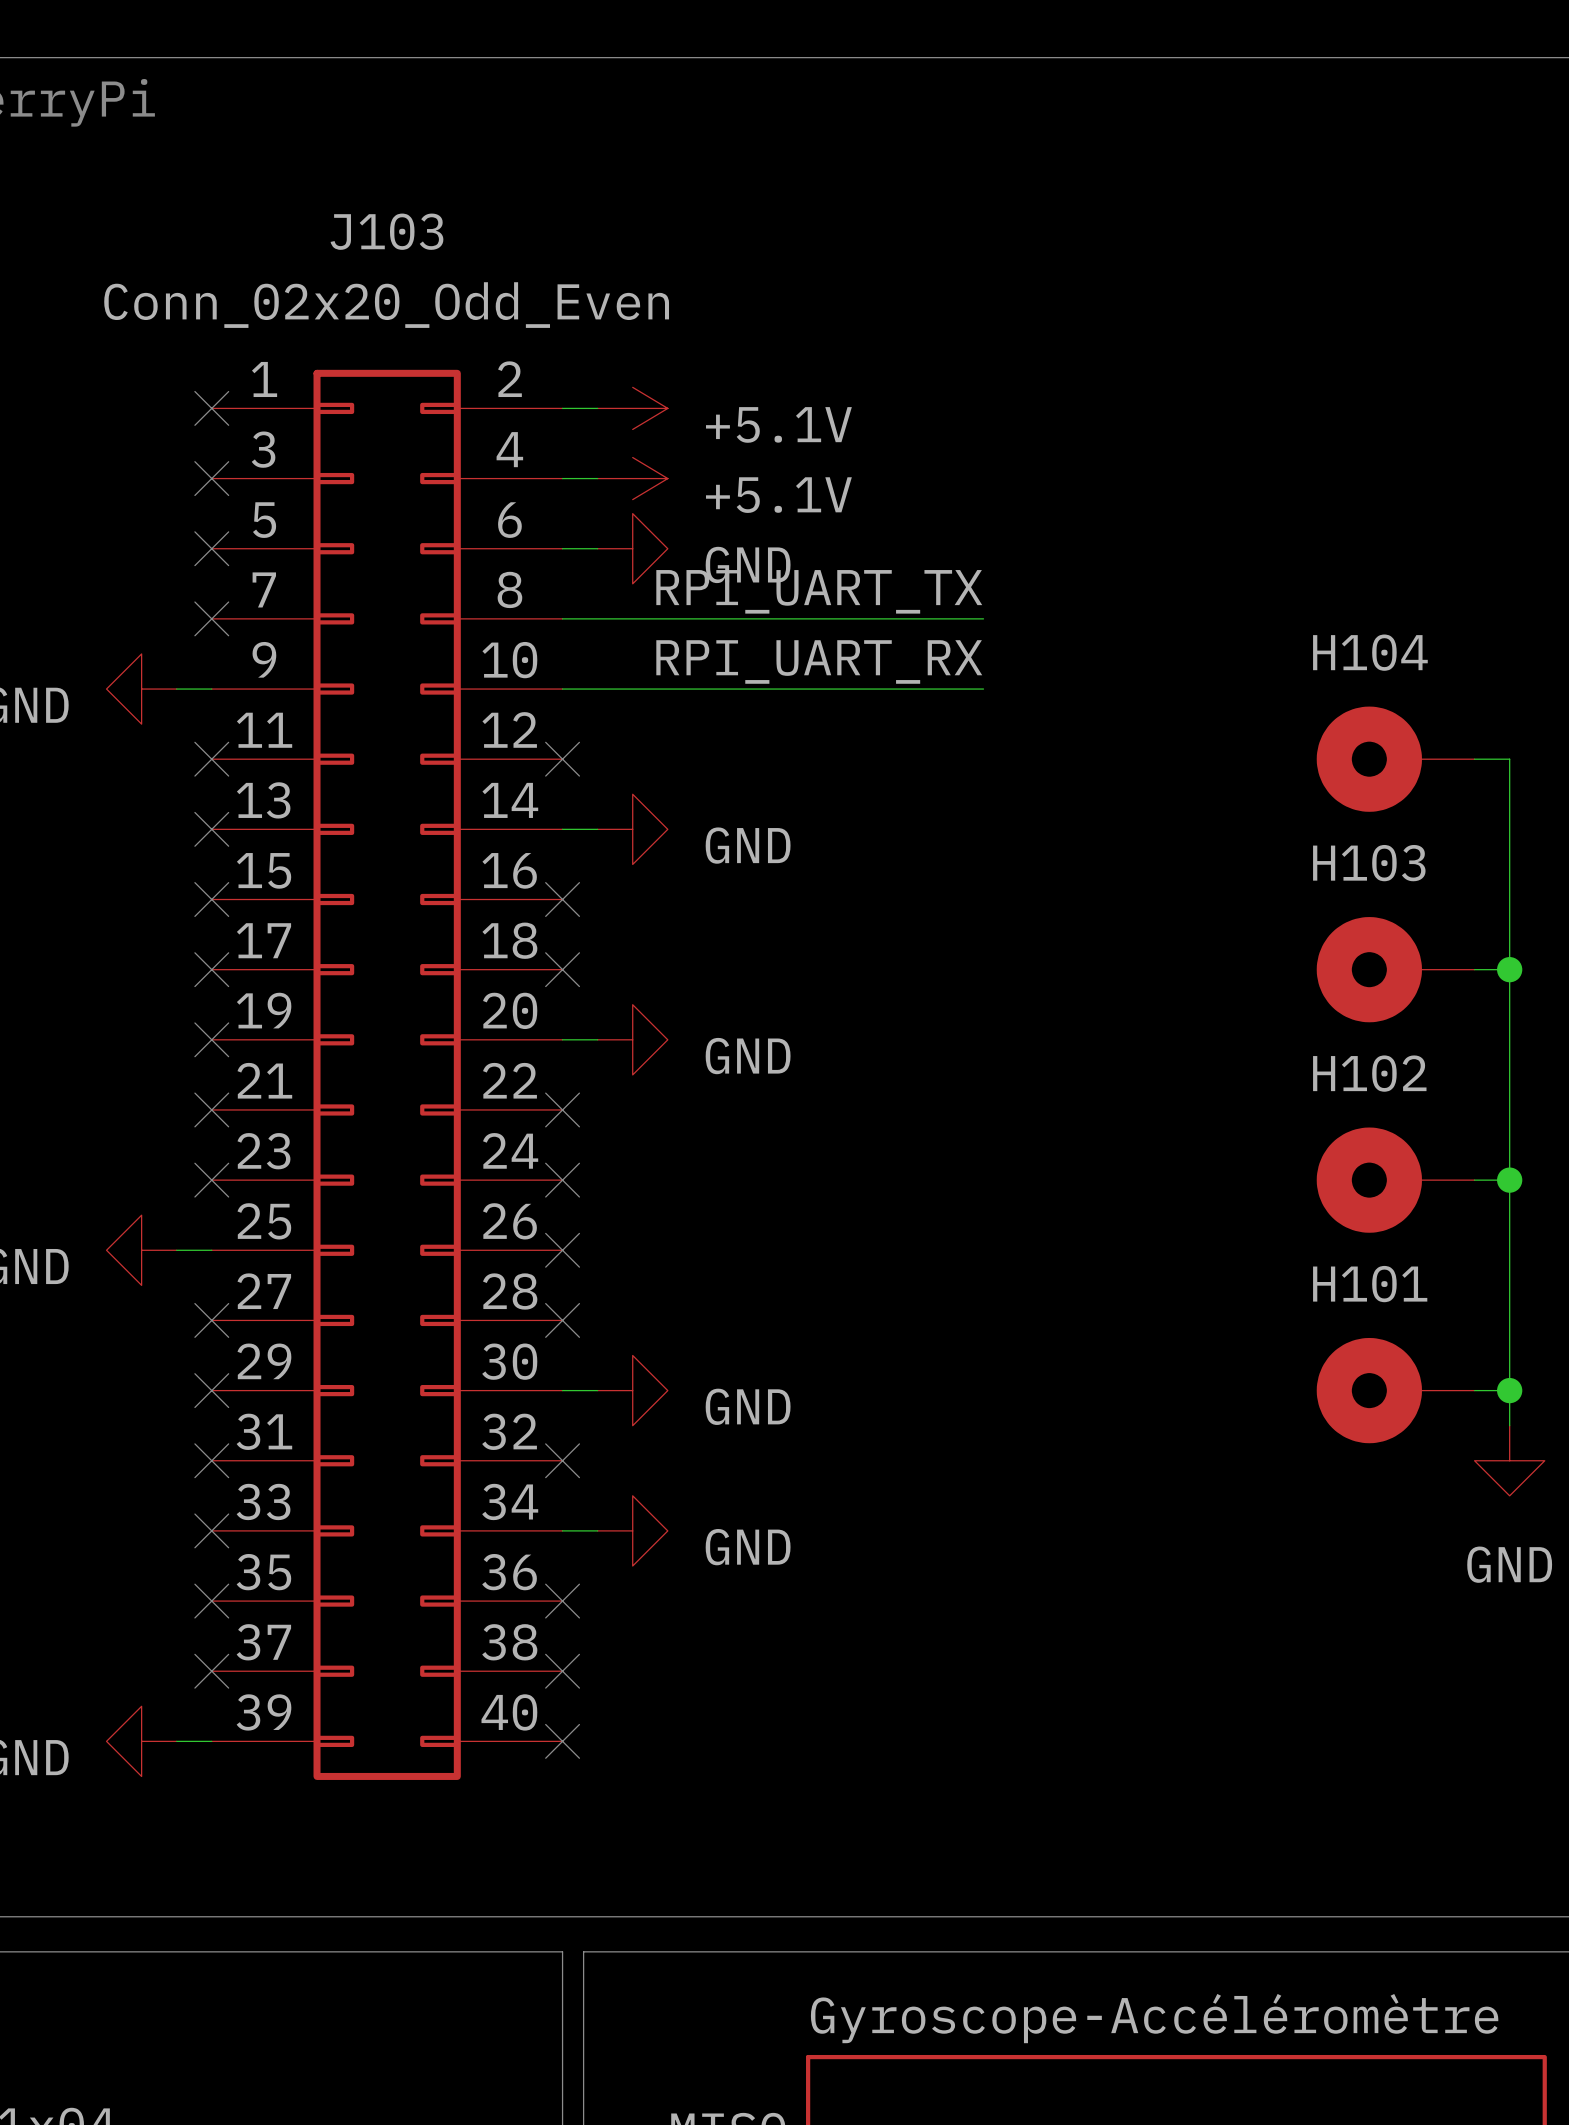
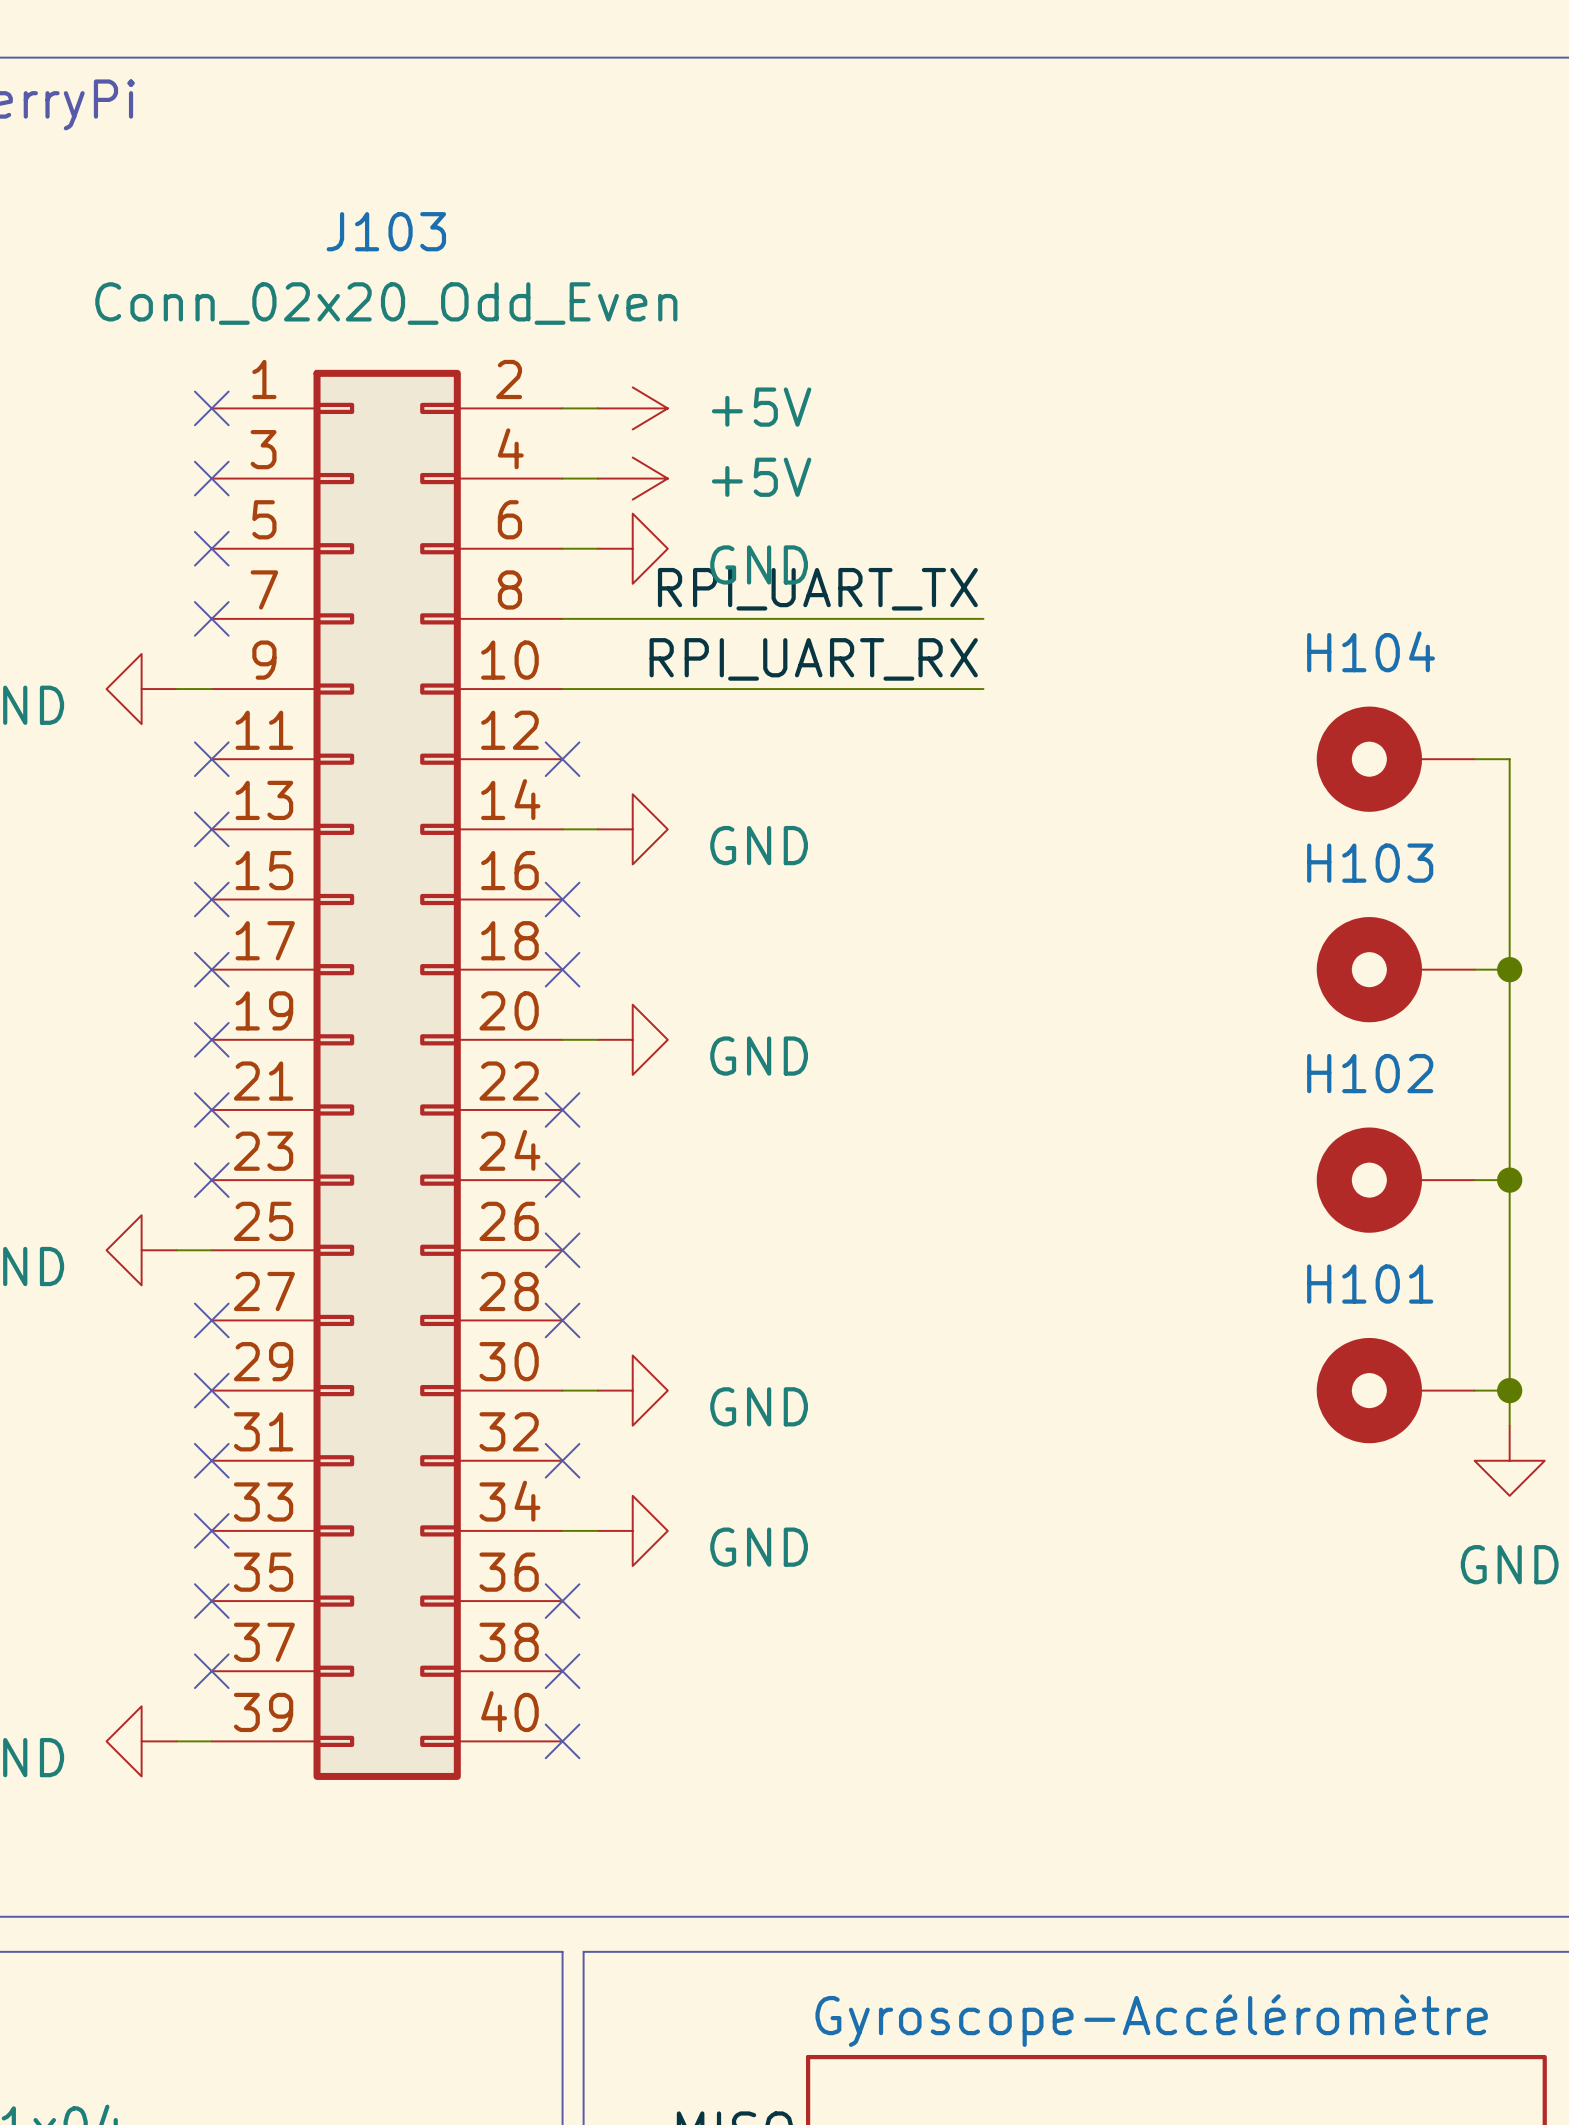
power symbol: +5.1V (632, 408) -> +5V (632, 408)
power symbol: +5.1V (632, 478) -> +5V (632, 478)

